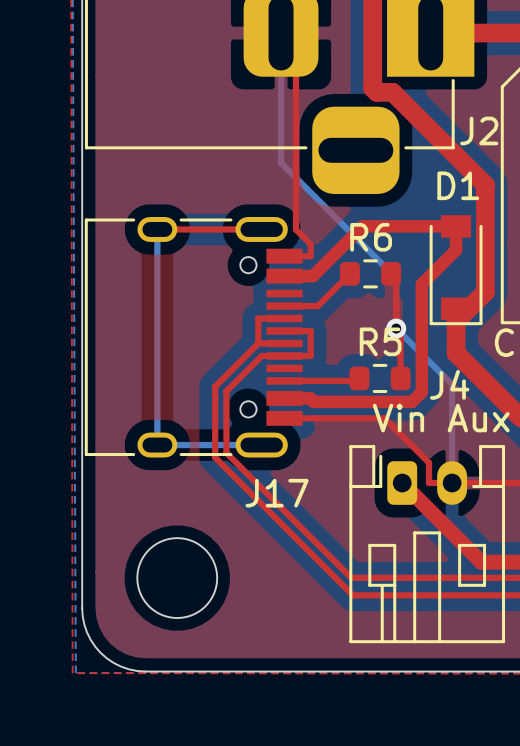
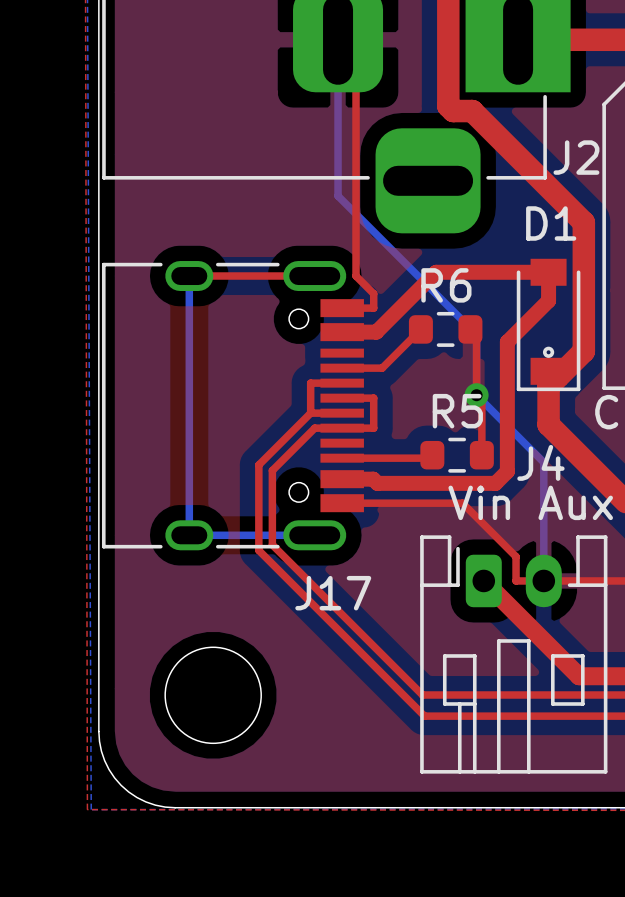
D1 footprint: [429, 215, 483, 326] -> [516, 258, 581, 392]

